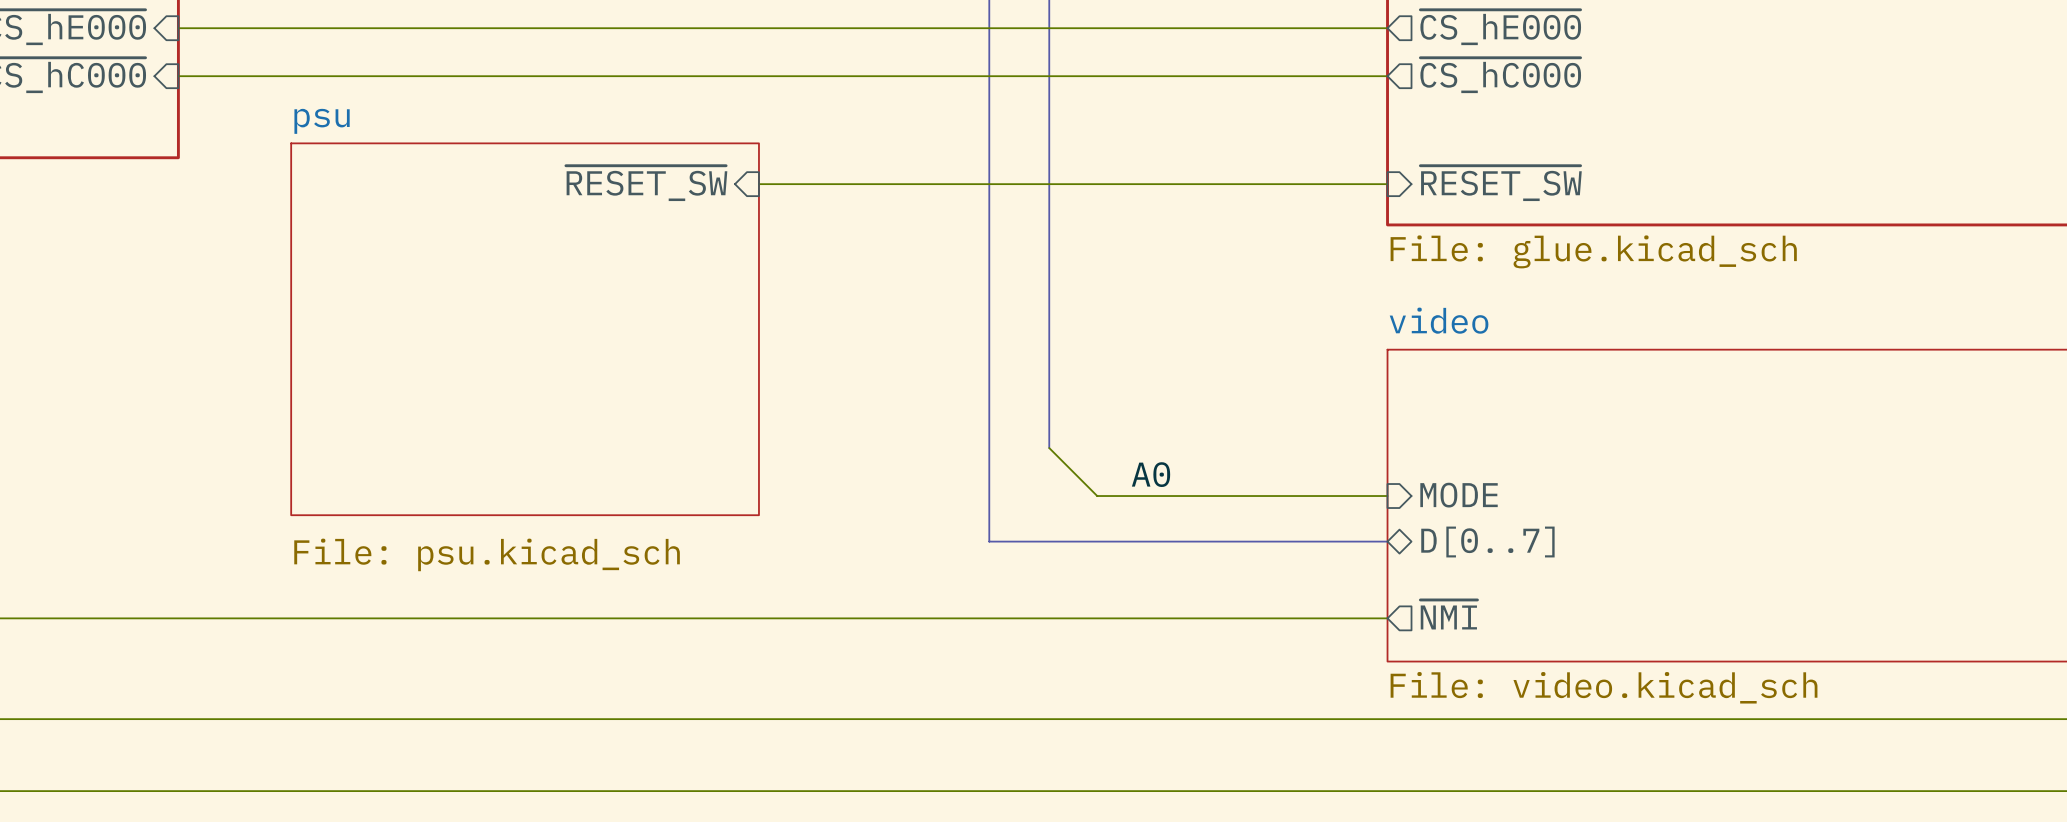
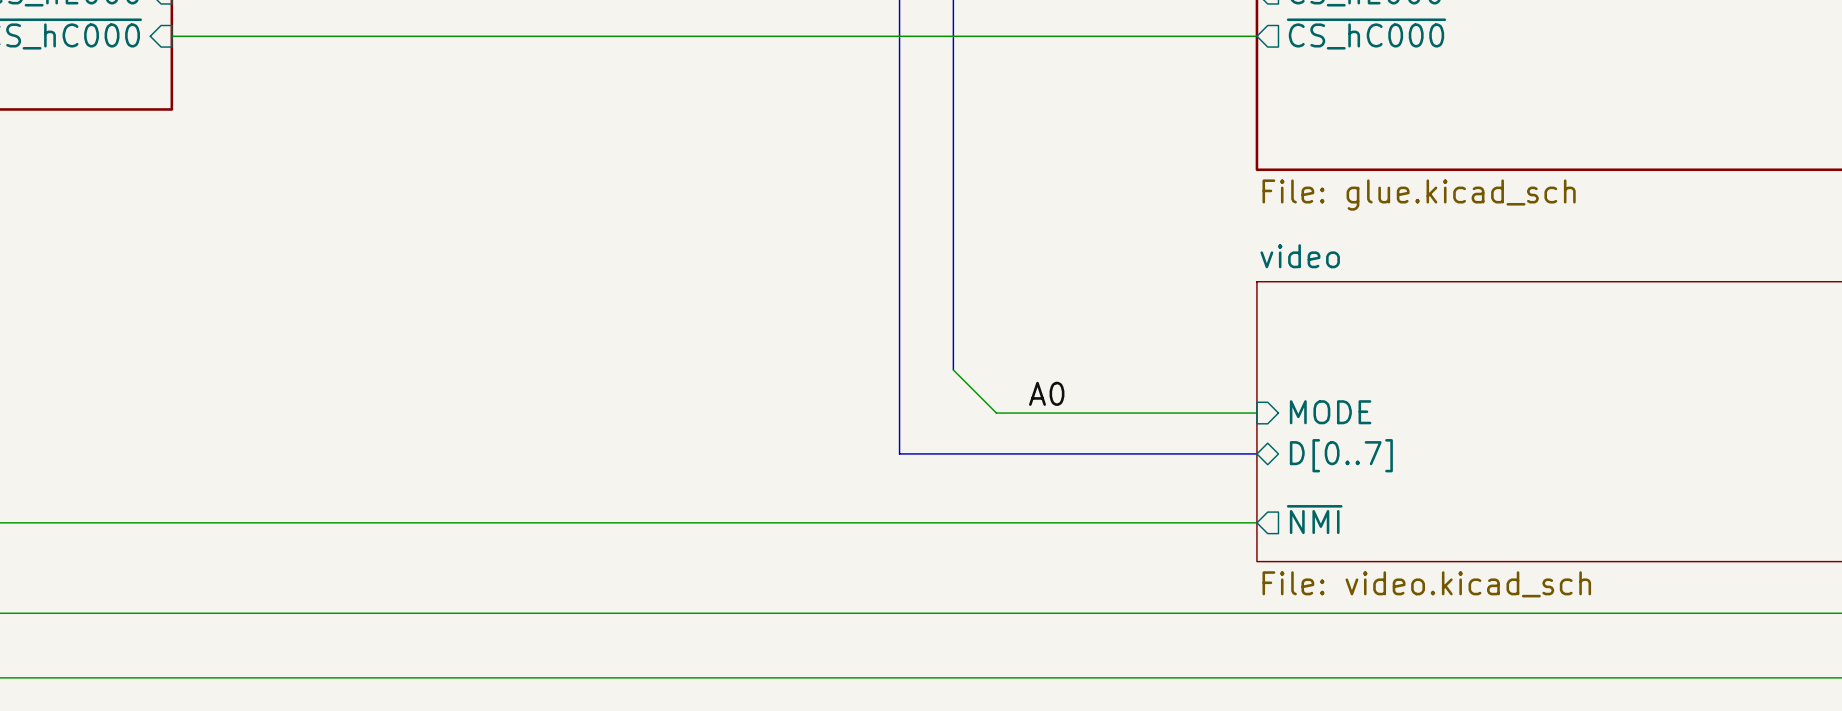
sheet pin: ~{RESET_SW} (646, 183) -> none
sheet pin: ~{RESET_SW} (1501, 183) -> none
wire: (758, 184) (1387, 184) -> none
sheet psu: File: psu.kicad_sch (525, 329) -> none

